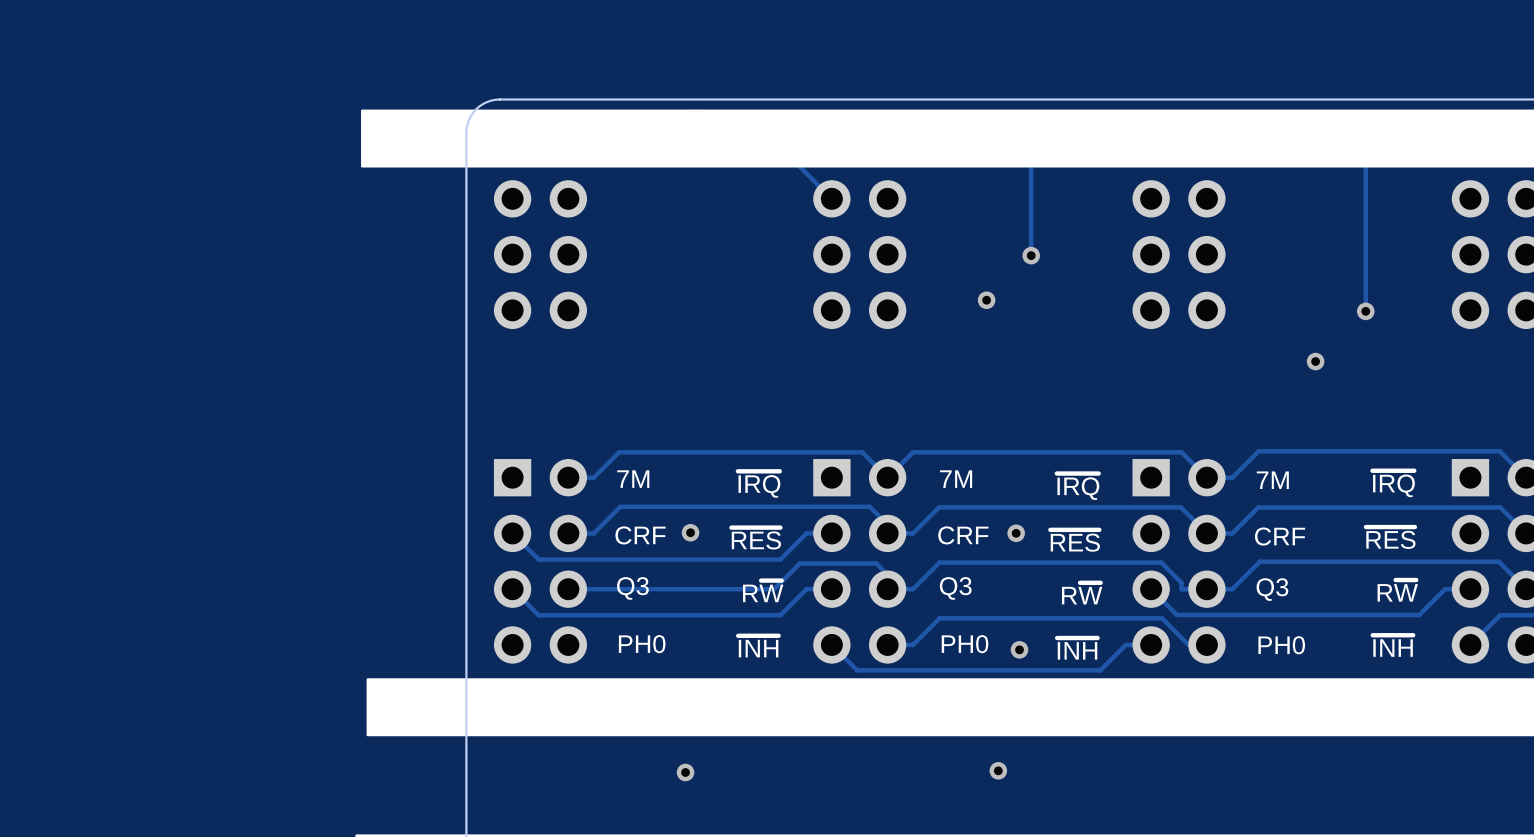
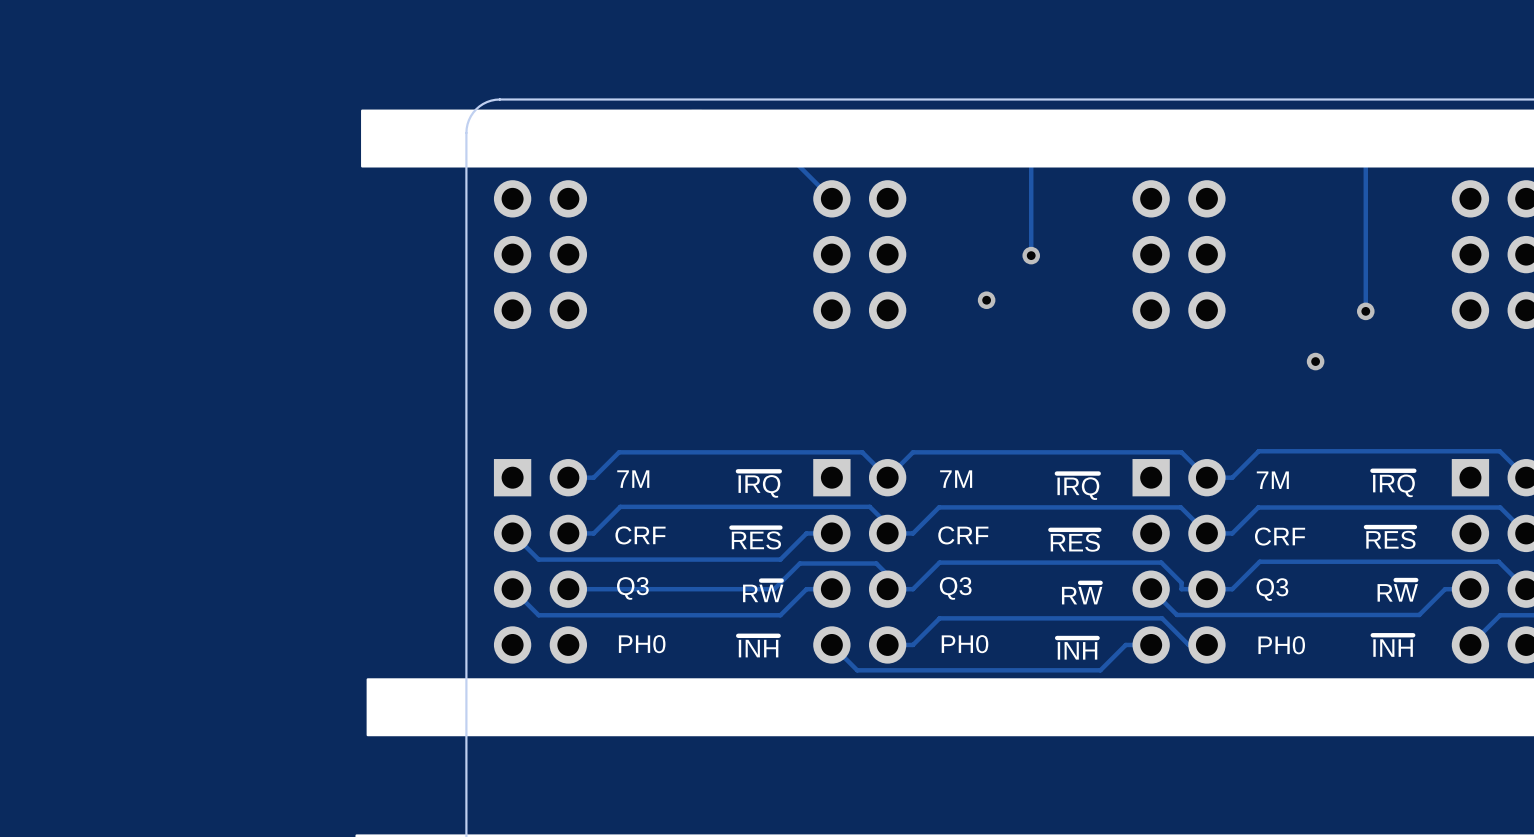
via: (690, 532) -> none
via: (1016, 533) -> none
via: (1019, 649) -> none
via: (998, 770) -> none
via: (685, 772) -> none

